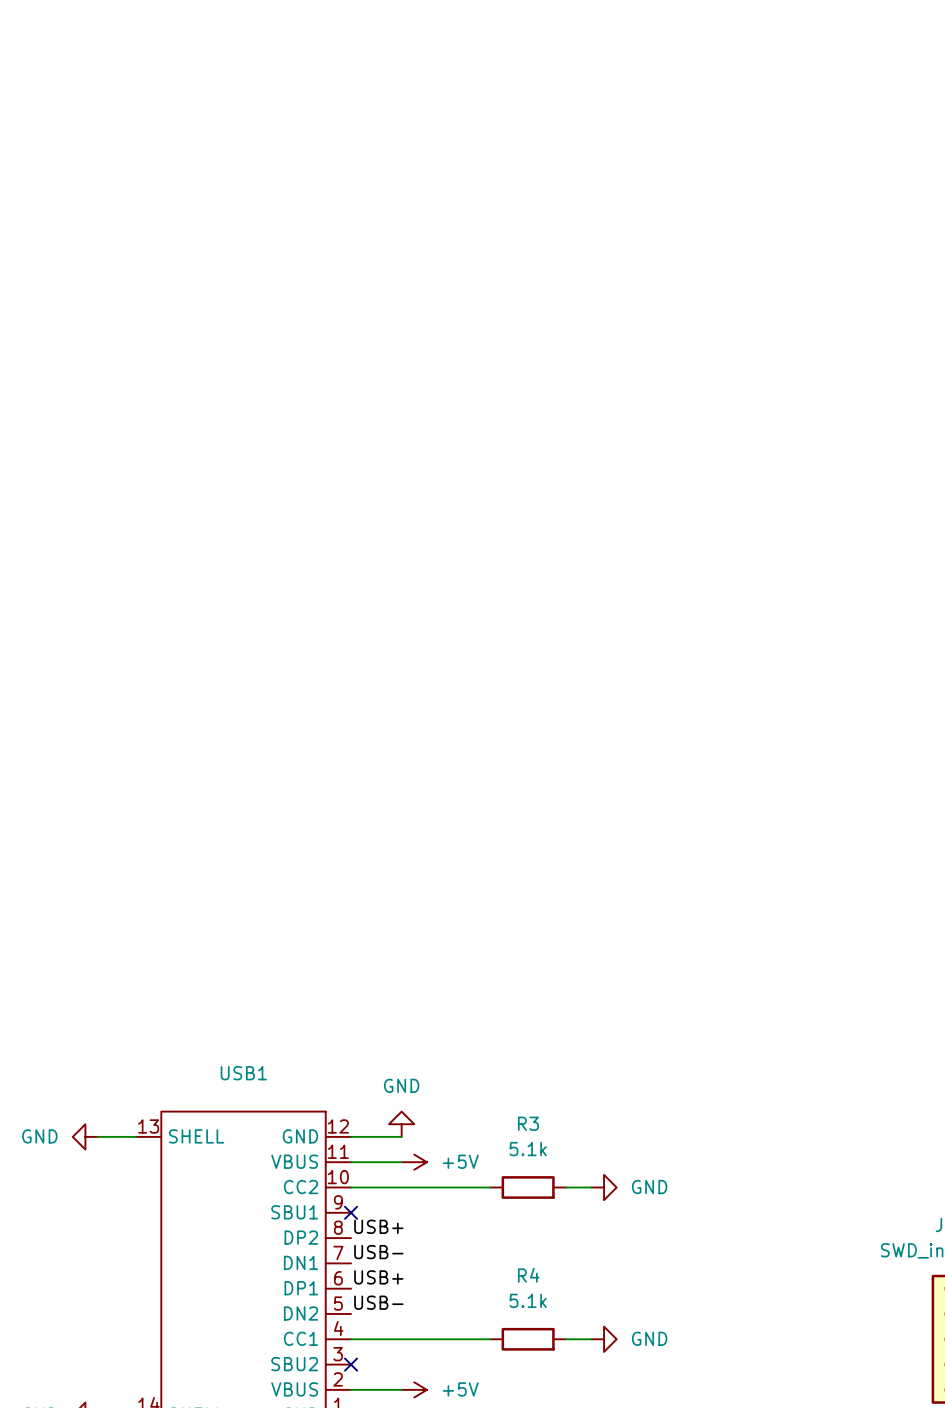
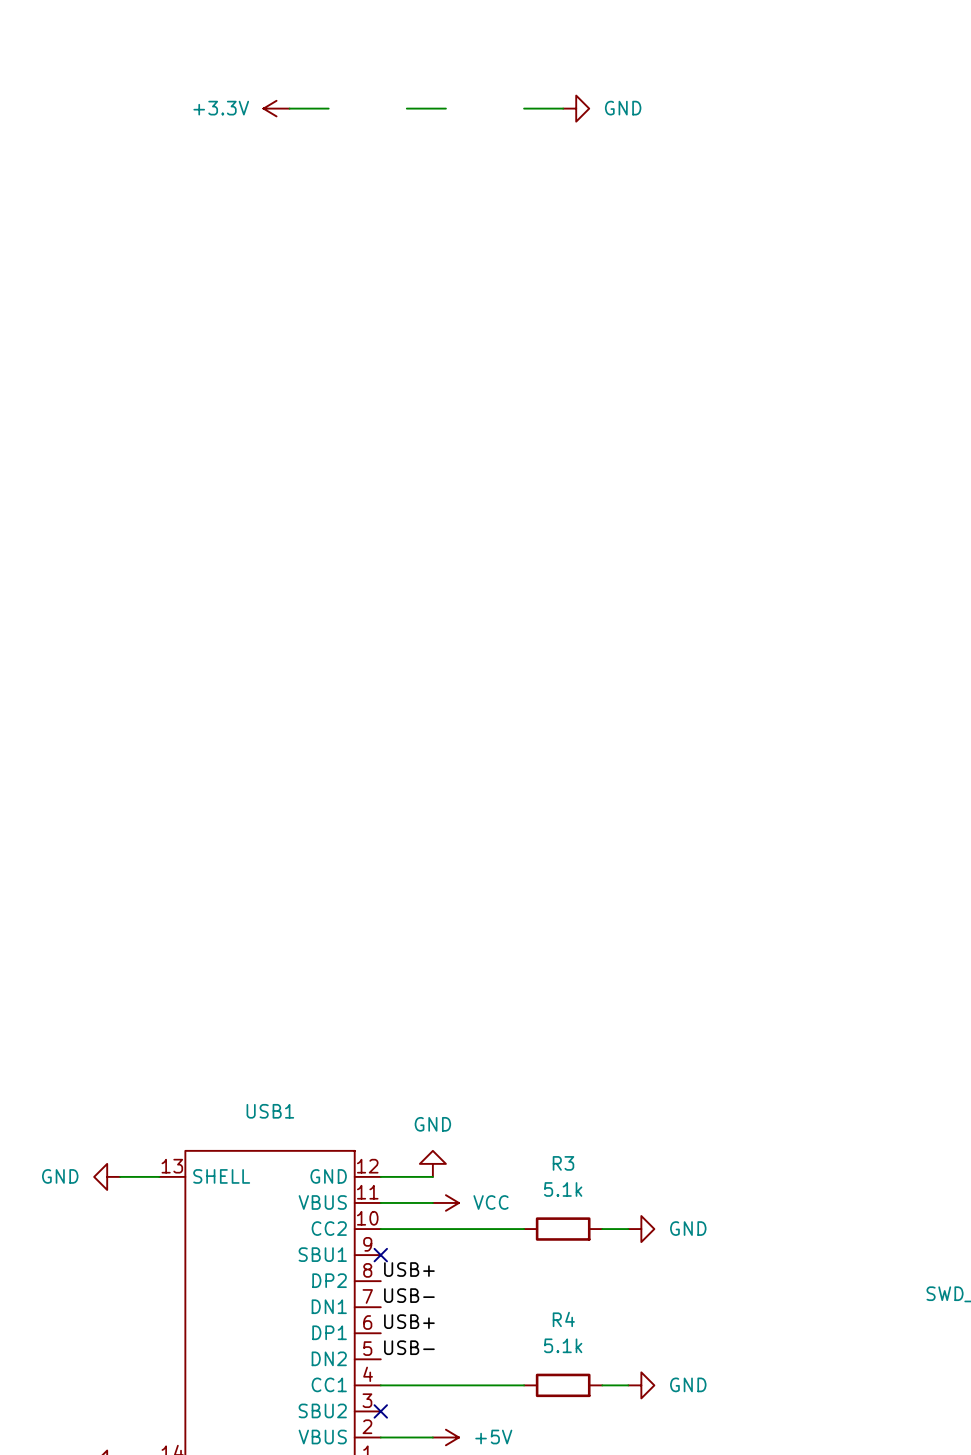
power symbol: none -> +3.3V (276, 108)
wire: none -> (289, 108) (328, 108)
wire: none -> (406, 108) (445, 108)
wire: none -> (524, 108) (563, 108)
power symbol: none -> GND (576, 108)
power symbol: +5V (414, 1162) -> VCC (445, 1202)

